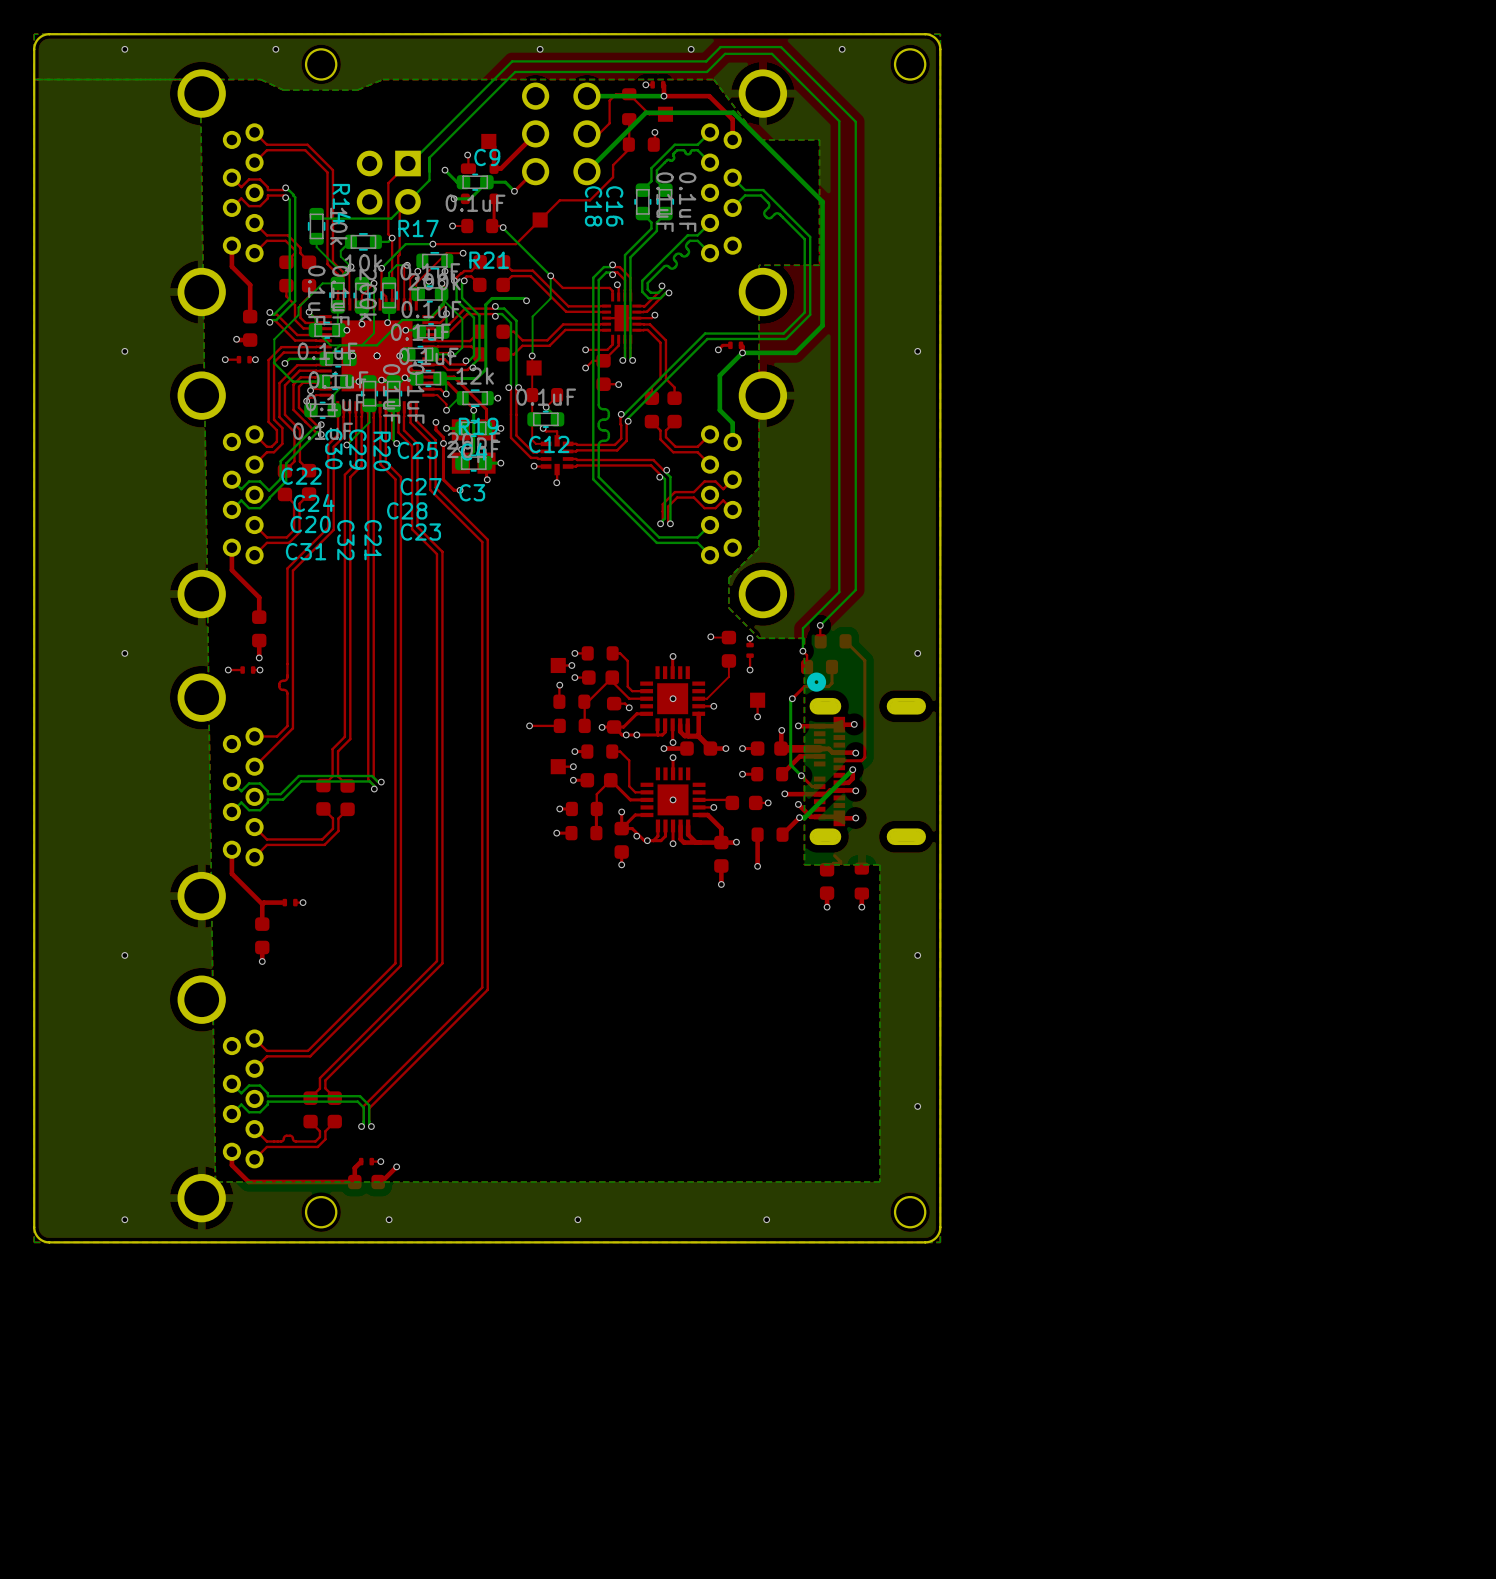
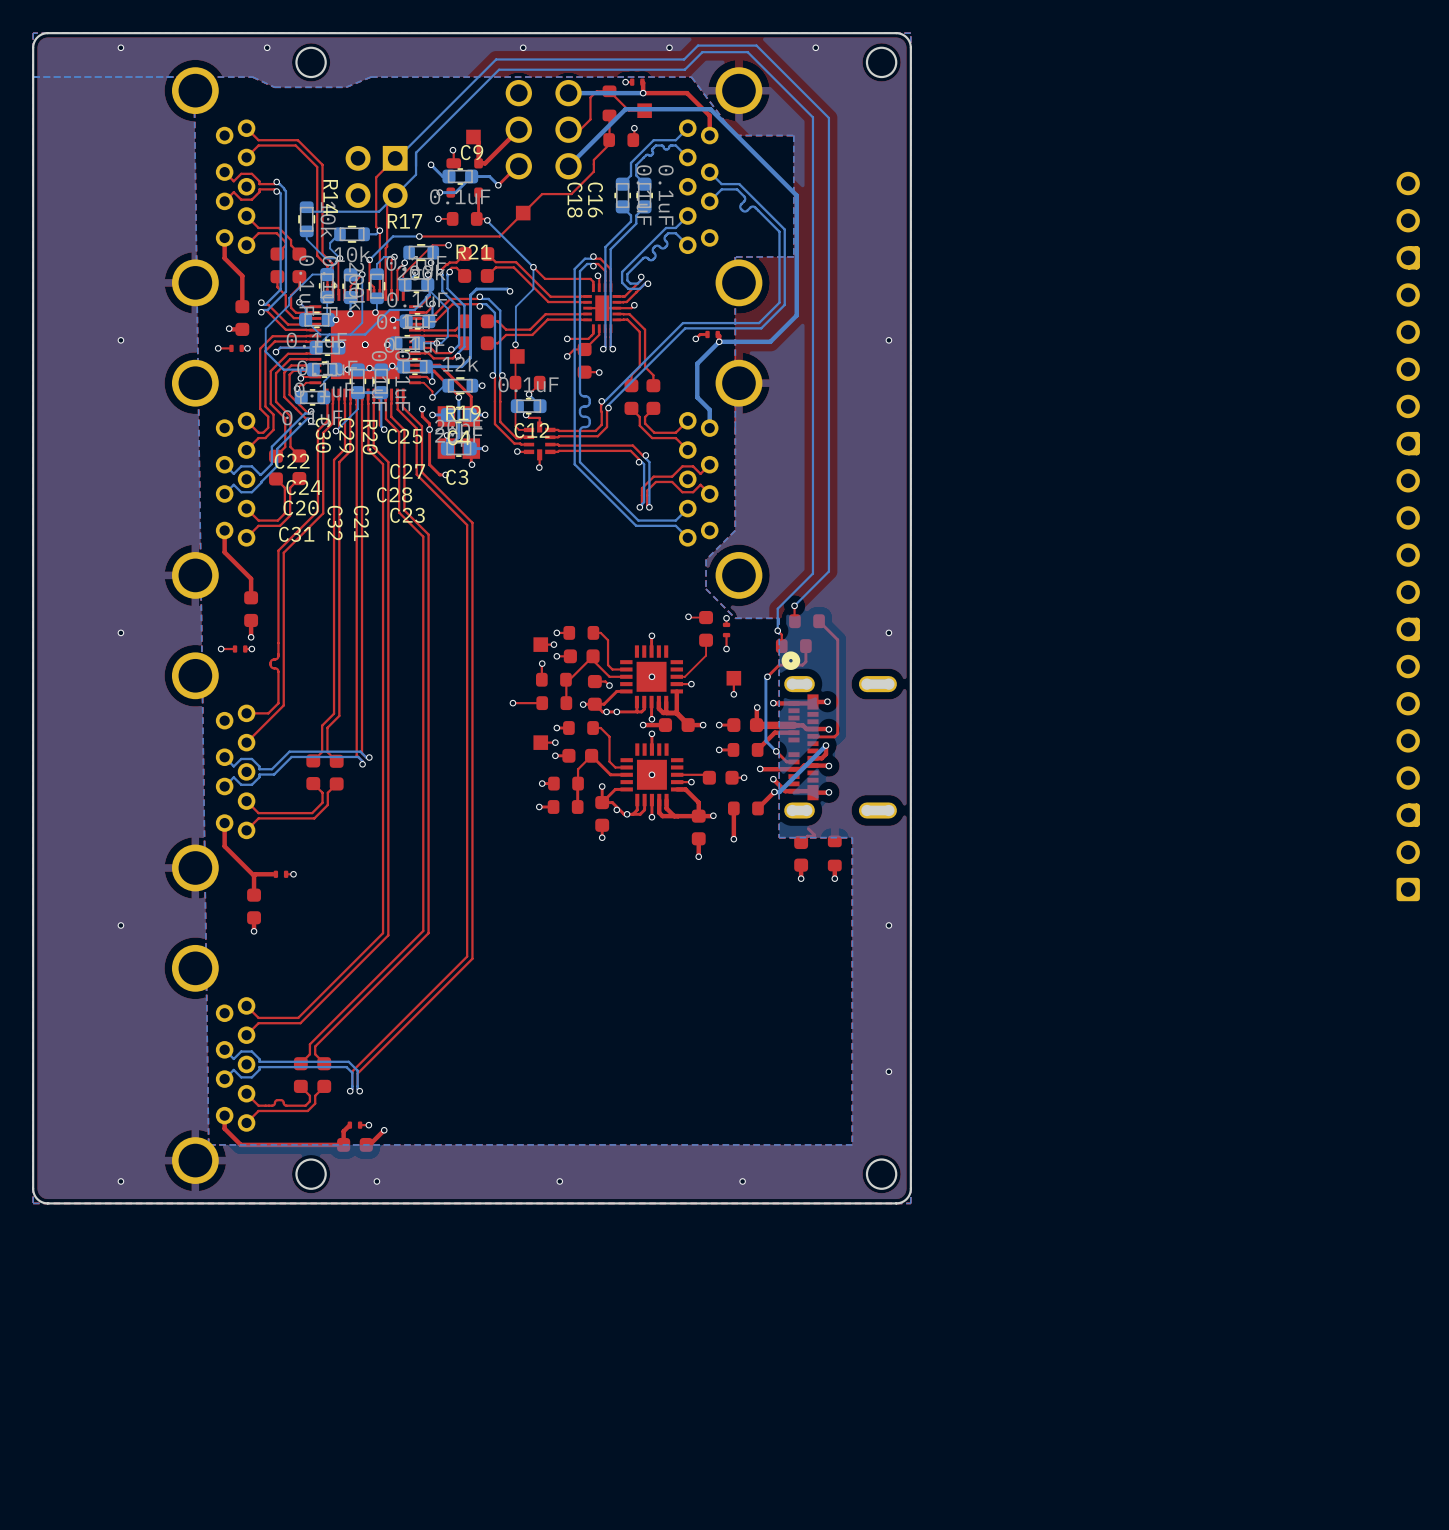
part: none -> (1408, 536)

